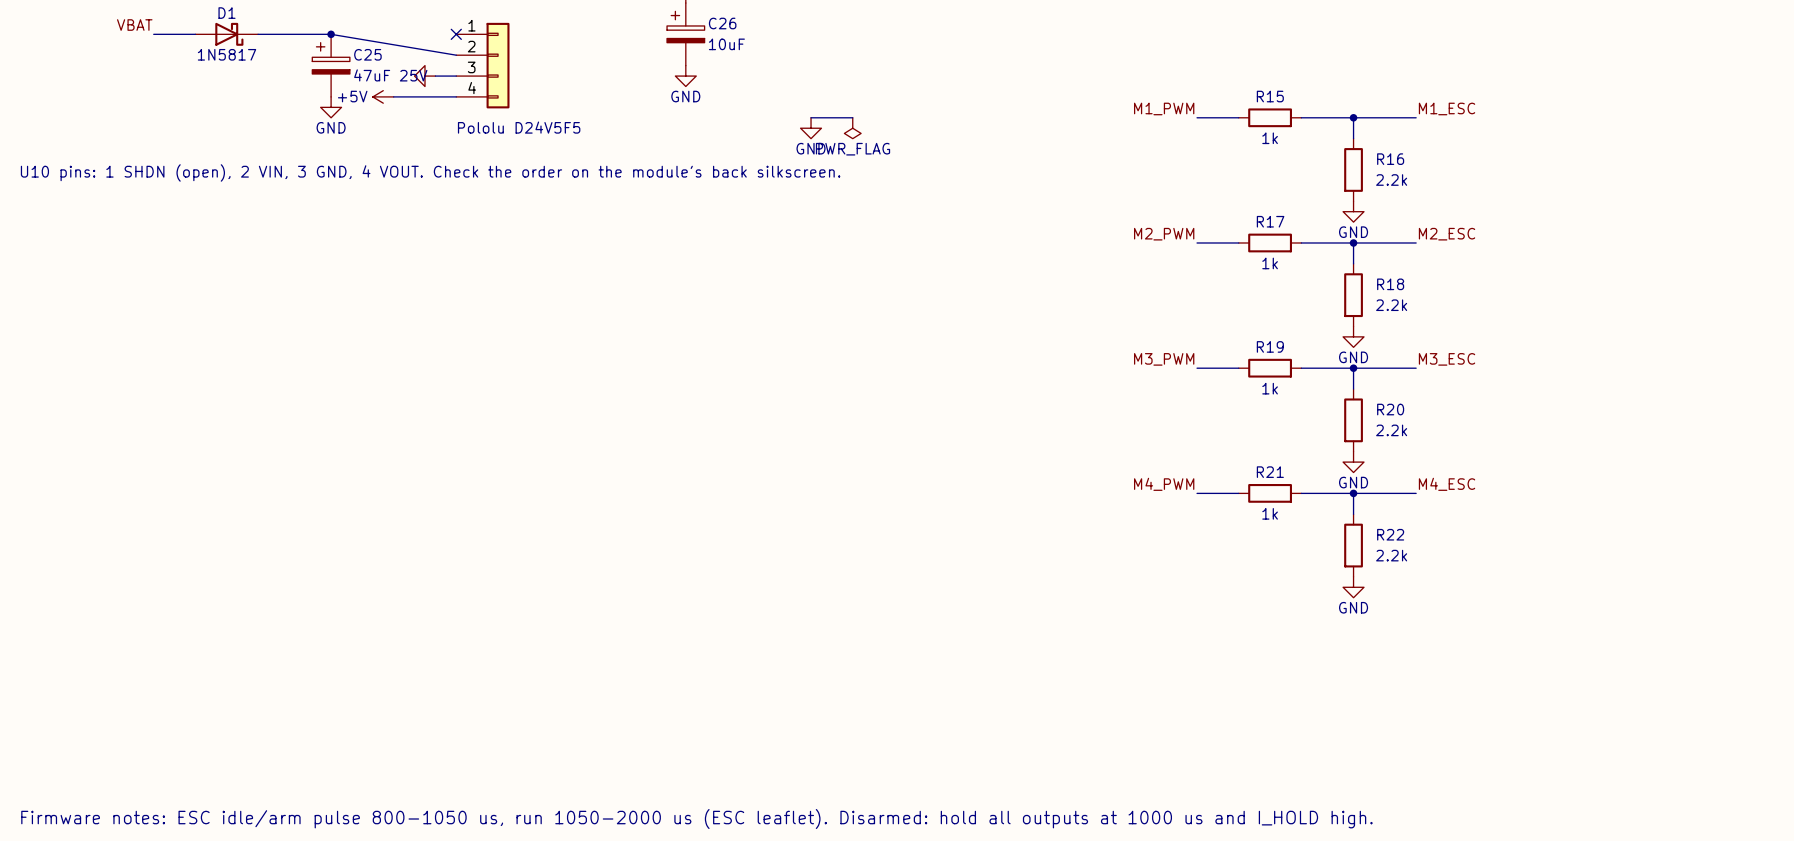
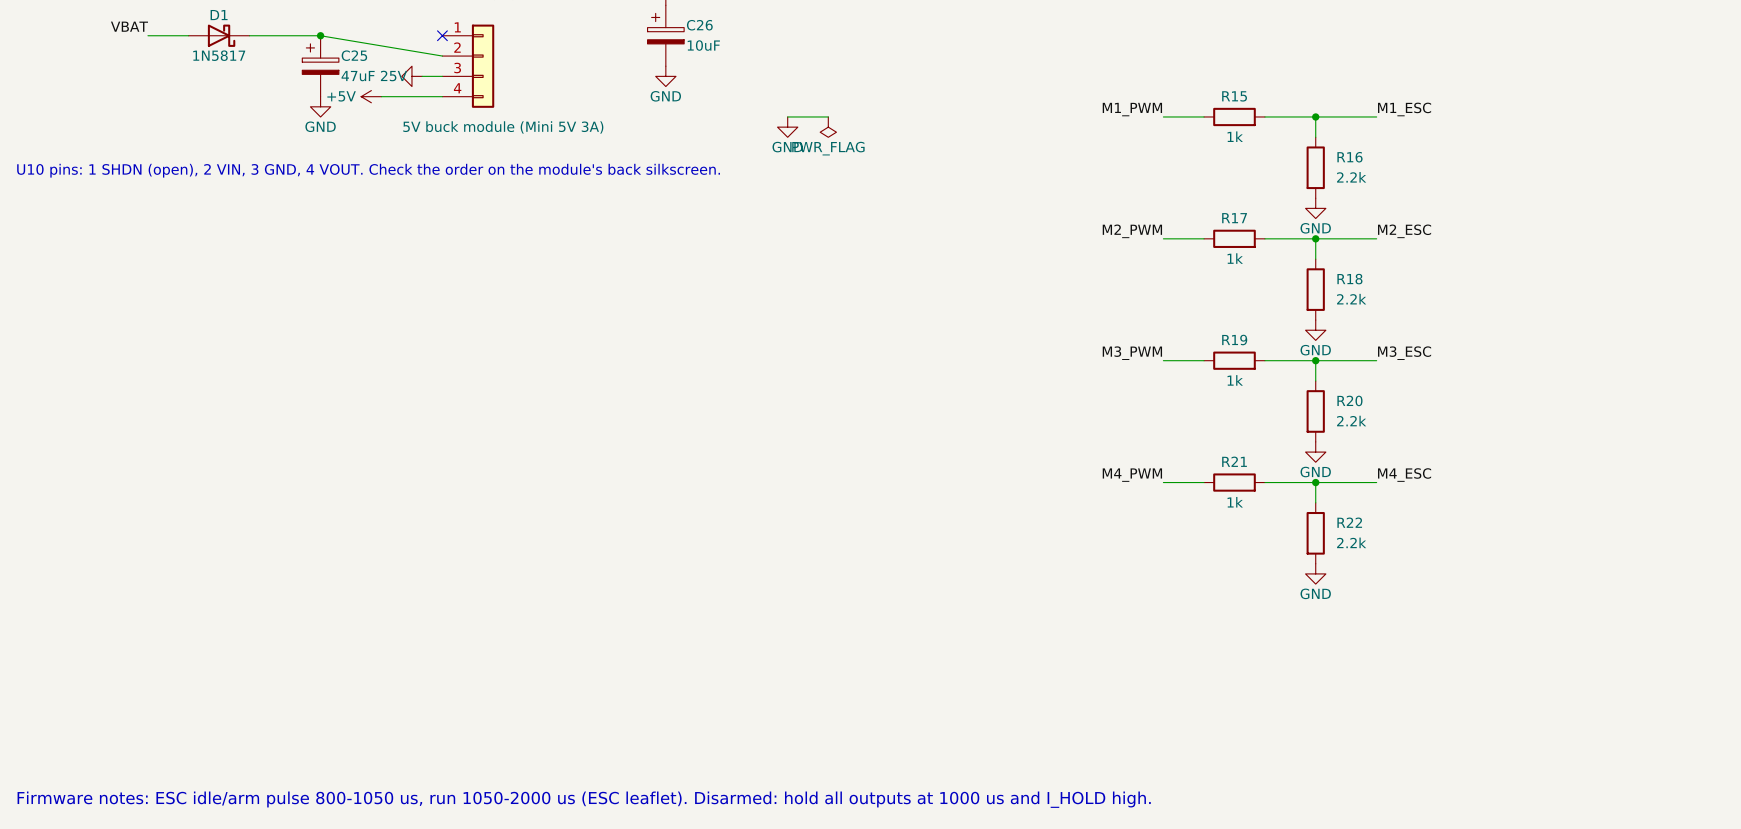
part value: Pololu D24V5F5 (519, 127) -> 5V buck module (Mini 5V 3A) (503, 127)

